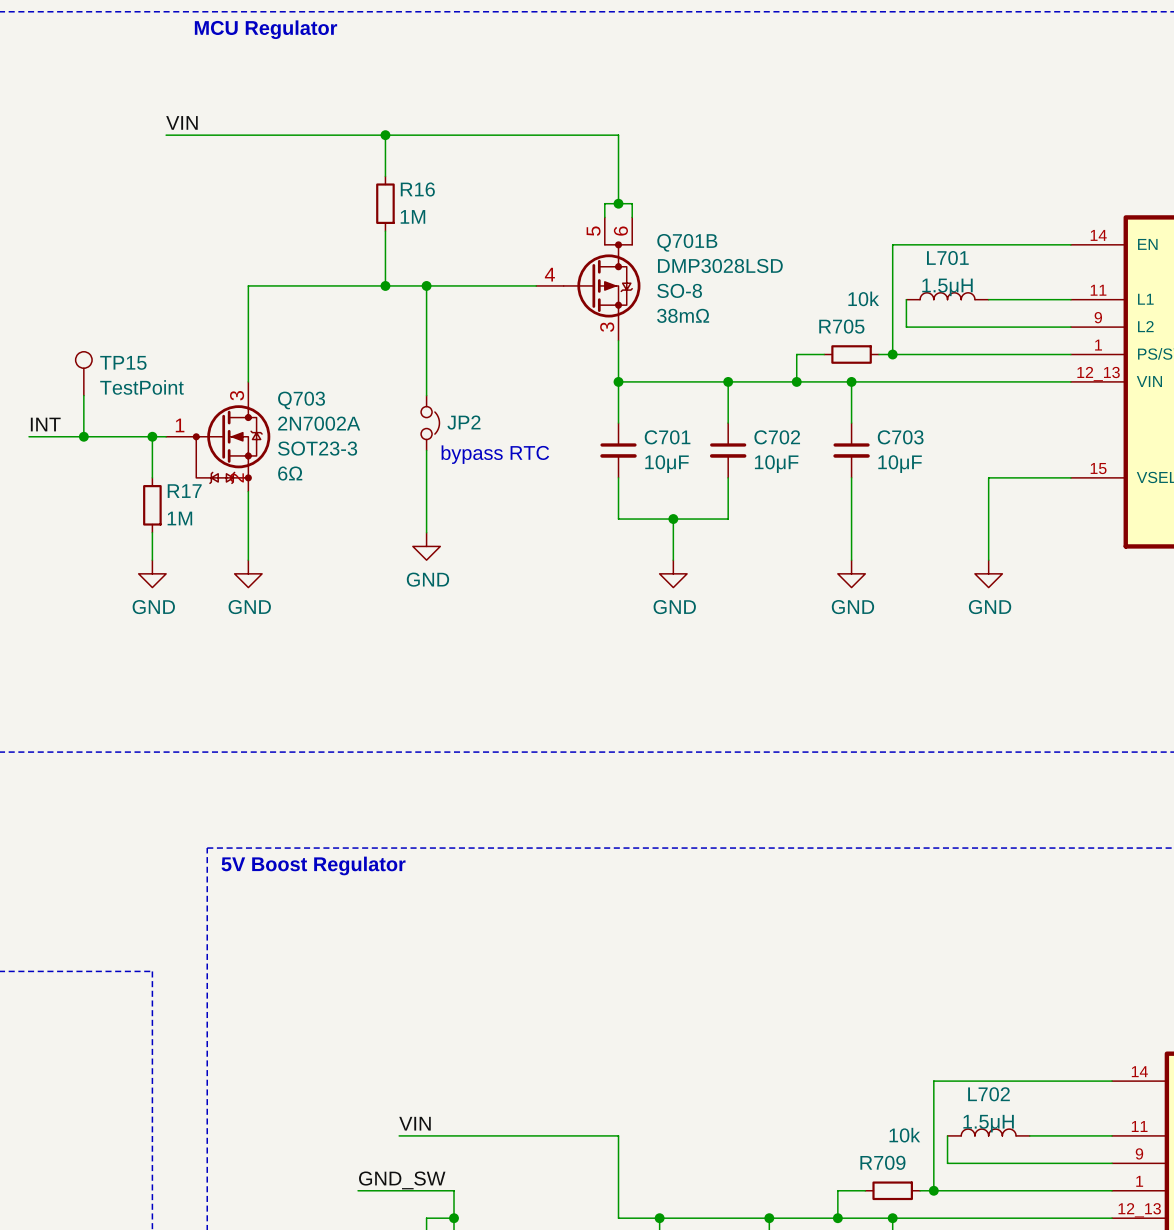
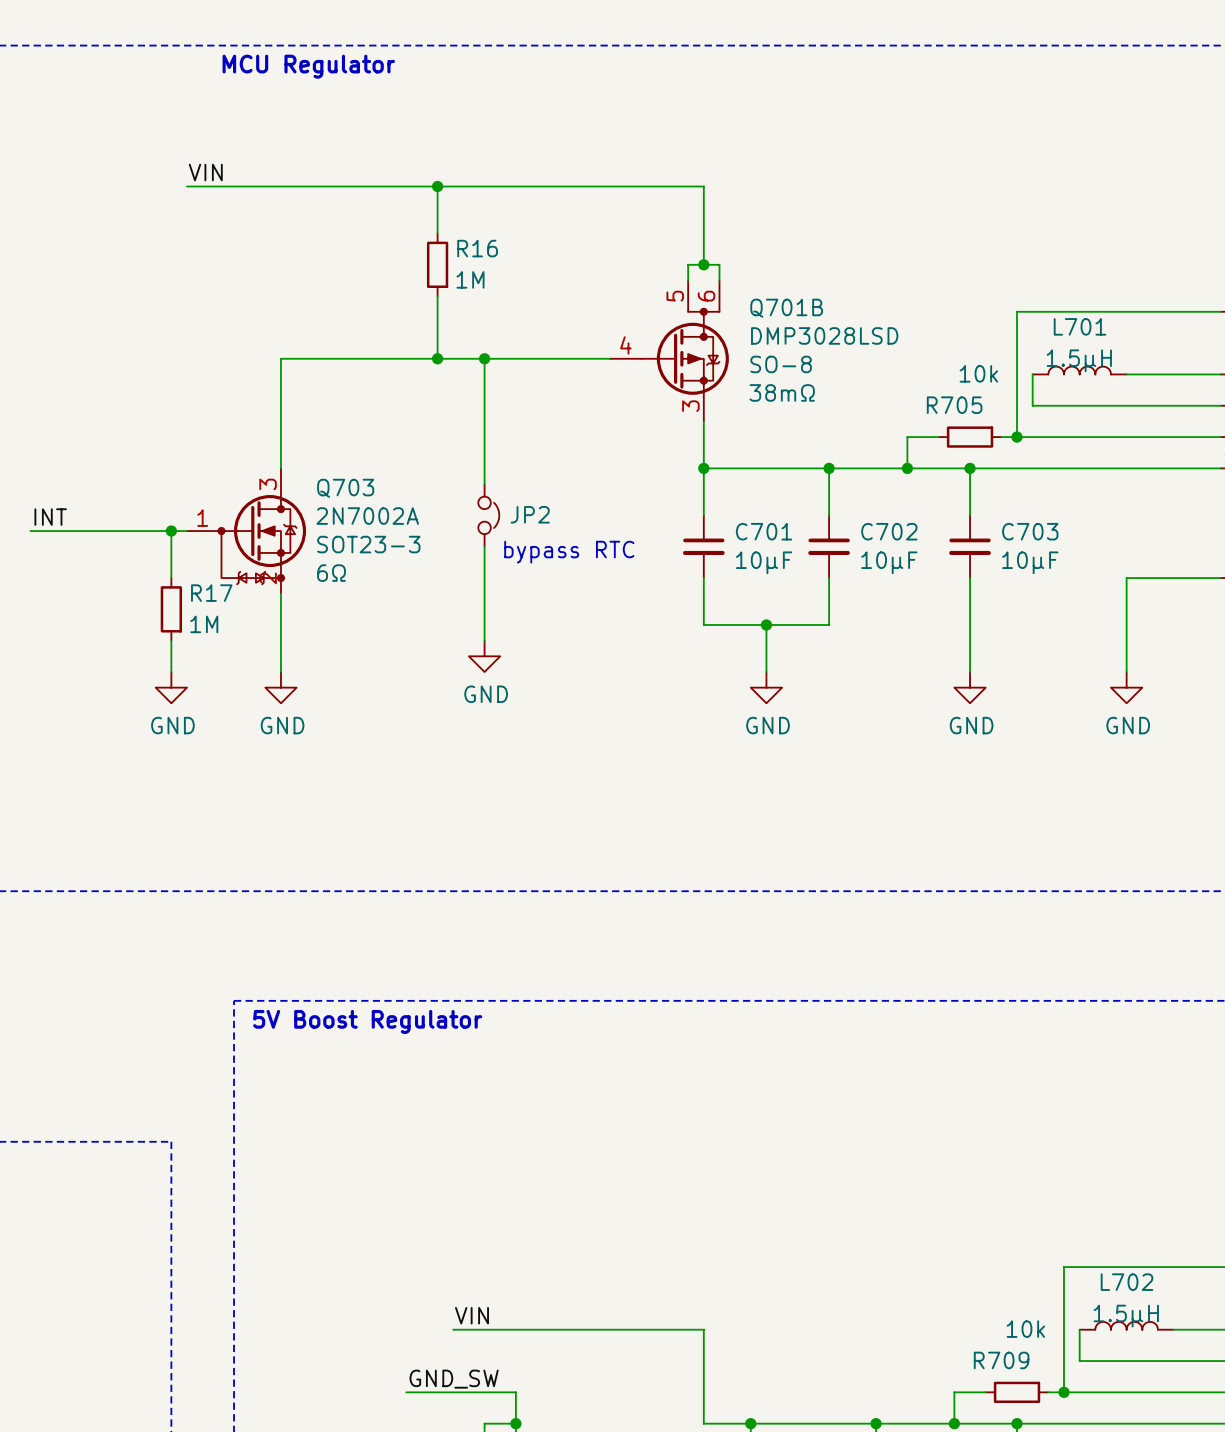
TP15: TestPoint (83, 373) -> none
wire: (83, 395) (83, 436) -> none
junction: (83, 436) -> none

